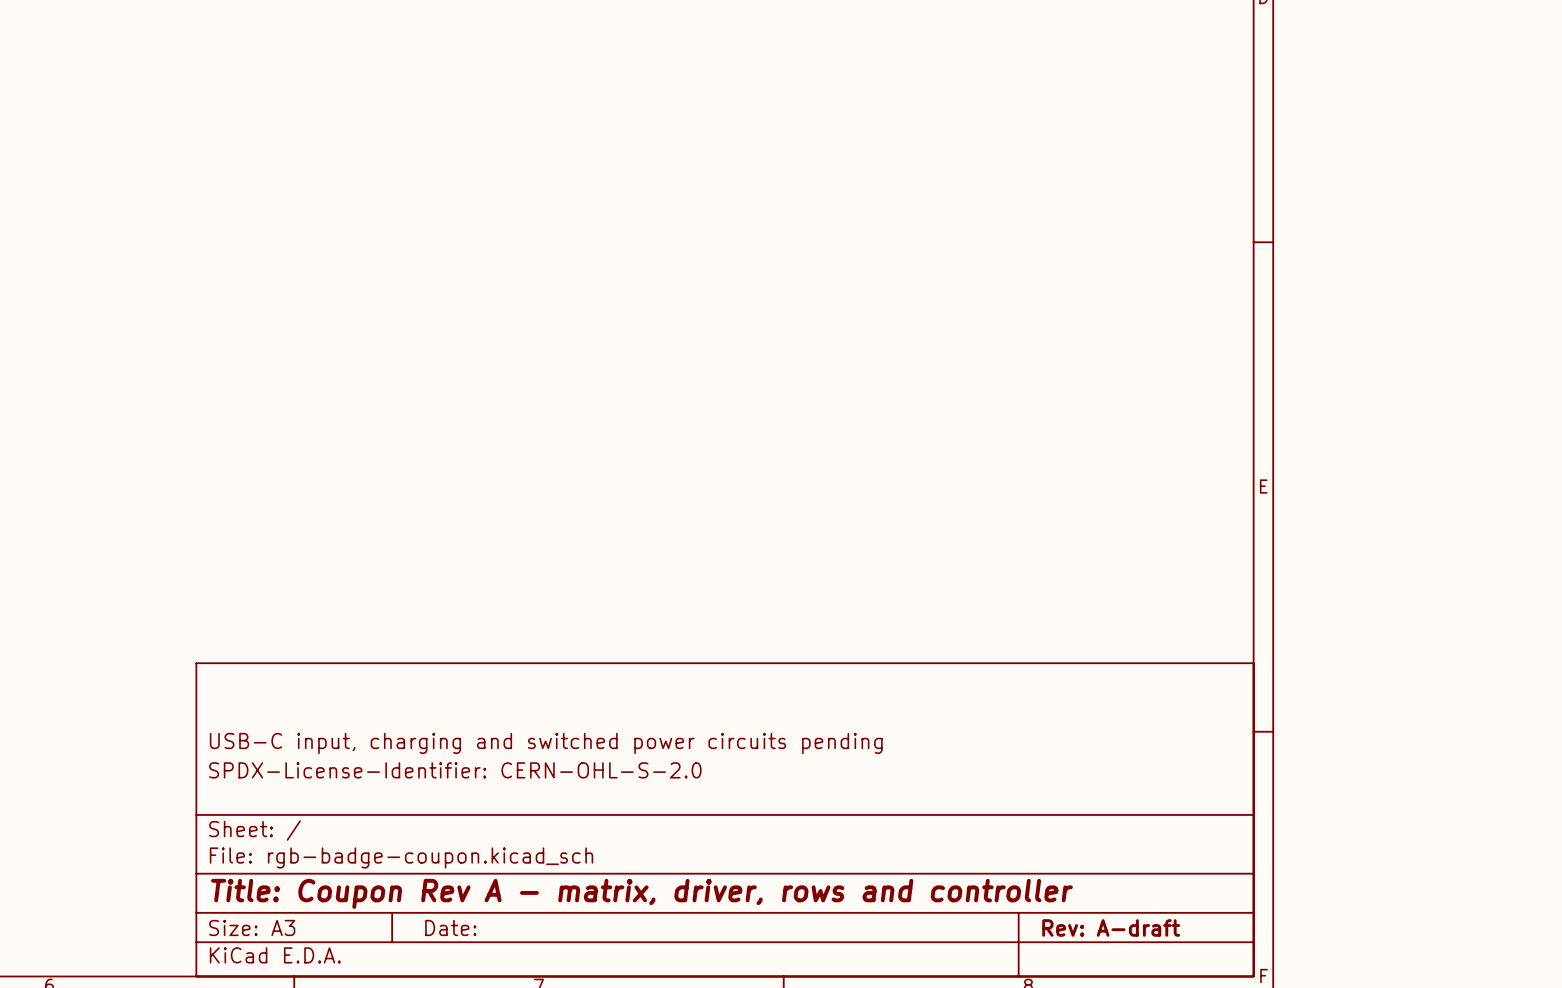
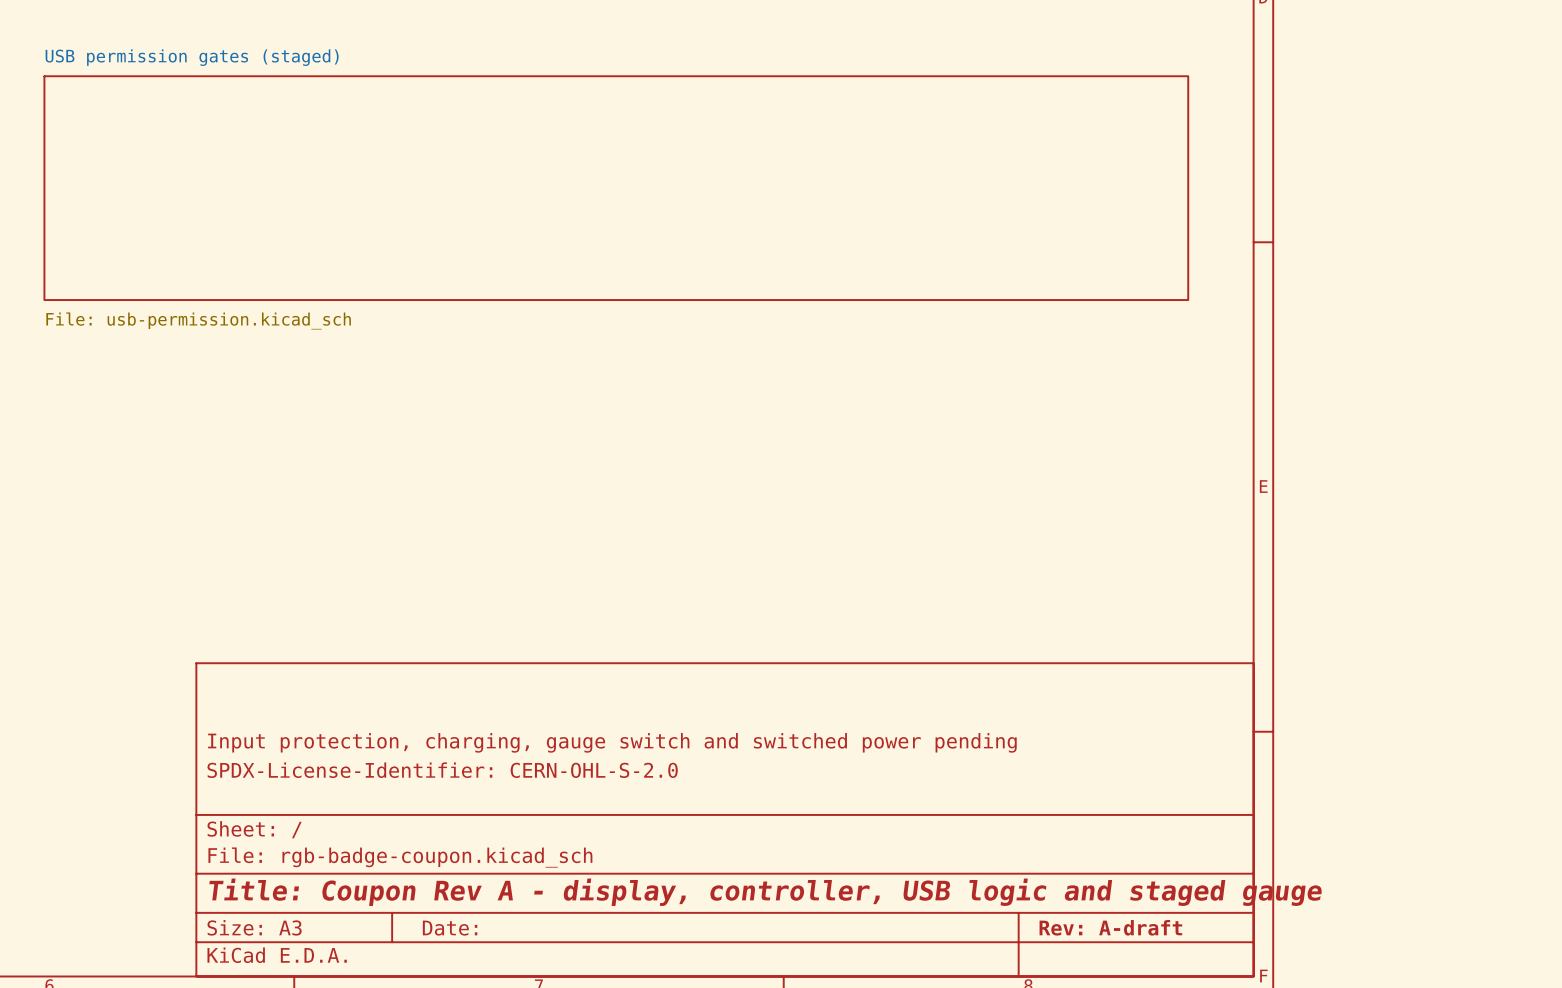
sheet USB permission gates (staged): none -> File: usb-permission.kicad_sch (616, 188)
title block: USB-C input, charging and switched power circuits pending (546, 743) -> Input protection, charging, gauge switch and switched power pending (612, 742)
title block: Title: Coupon Rev A - matrix, driver, rows and controller (641, 893) -> Title: Coupon Rev A - display, controller, USB logic and staged gauge (765, 892)

